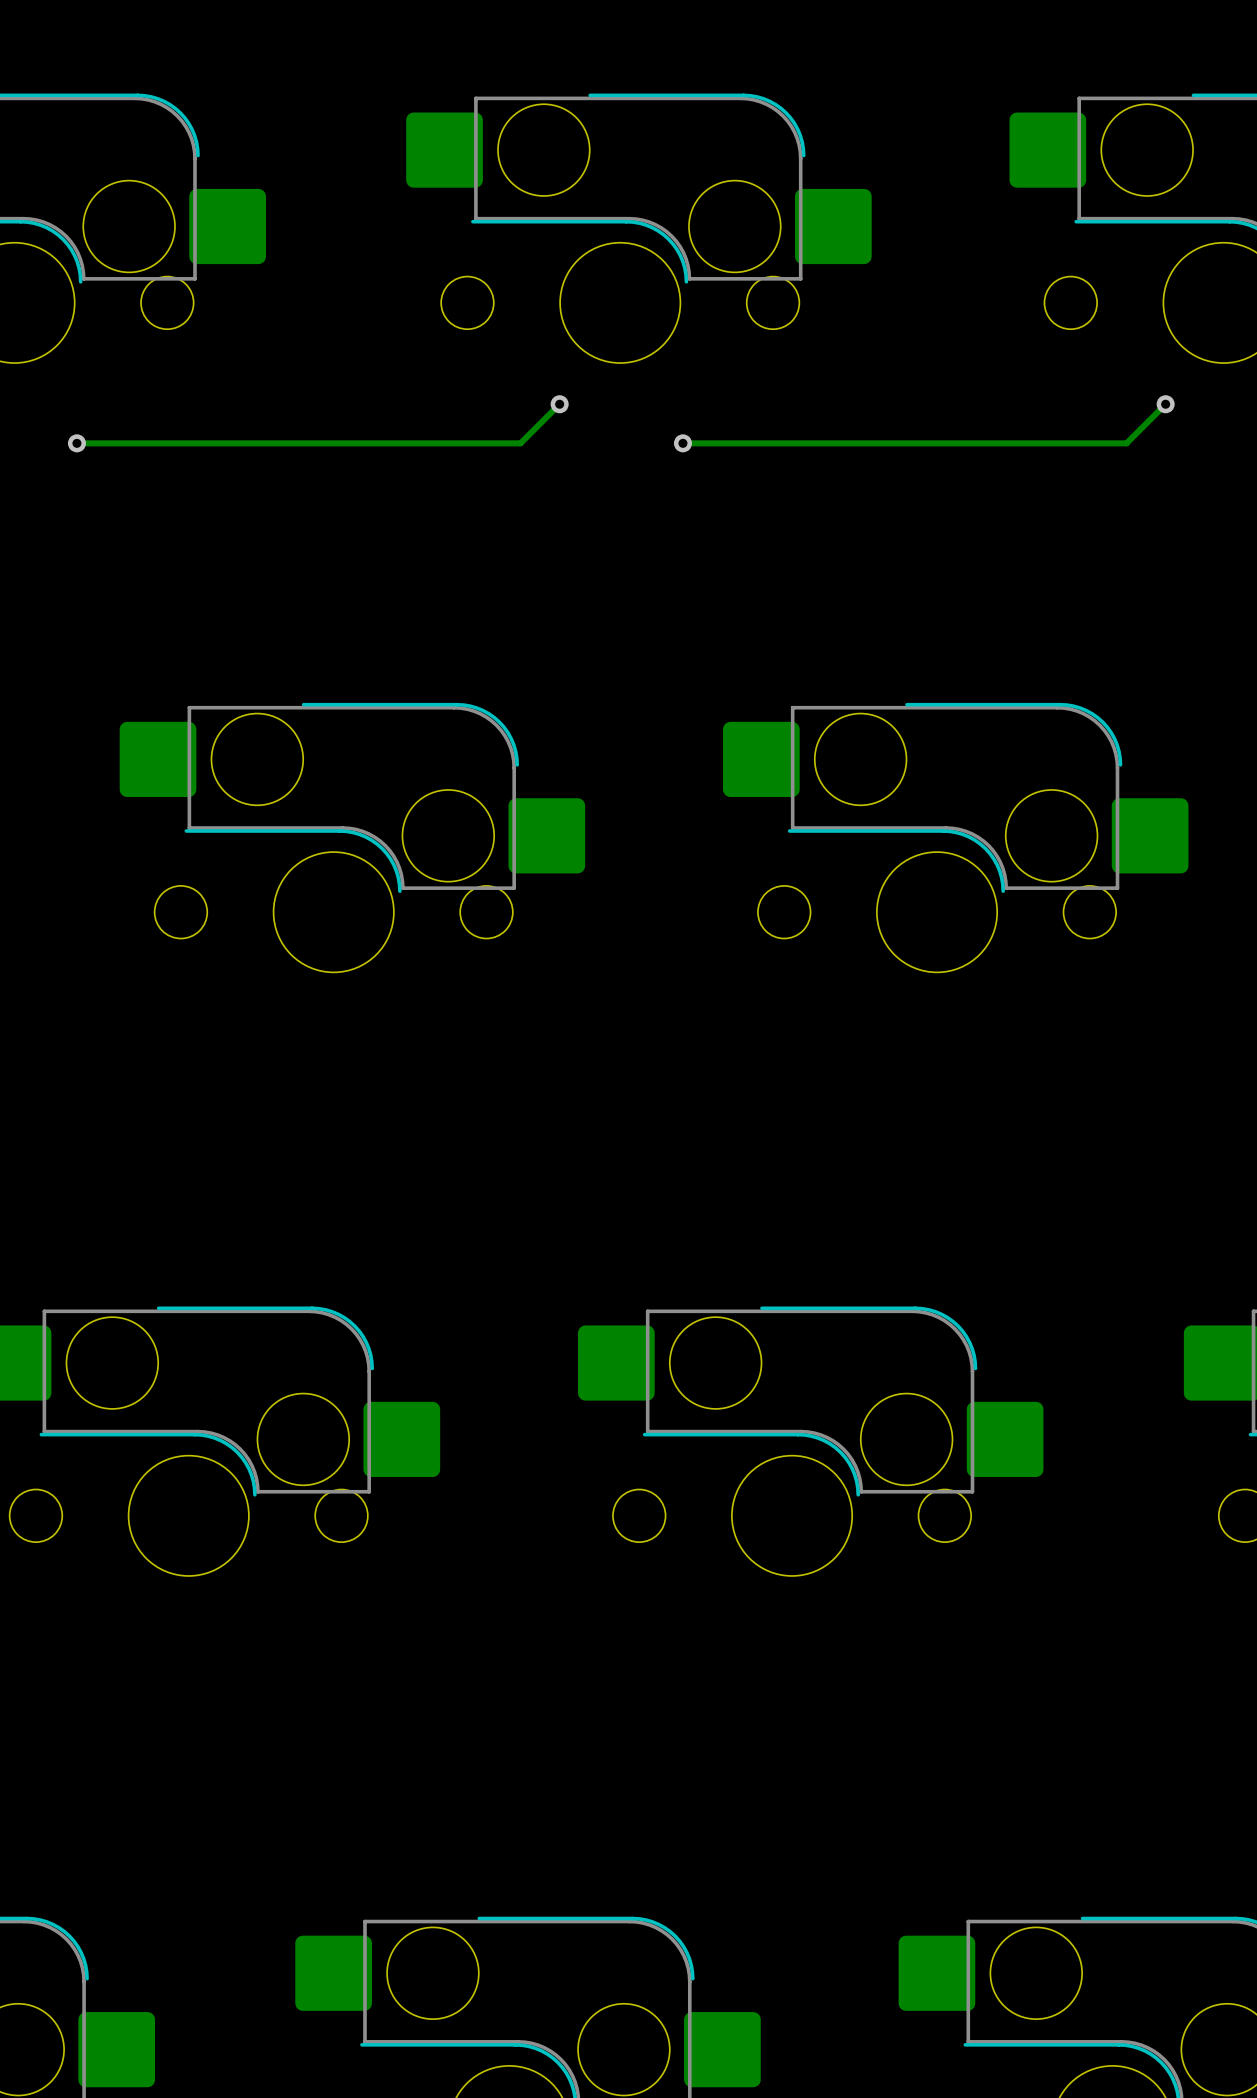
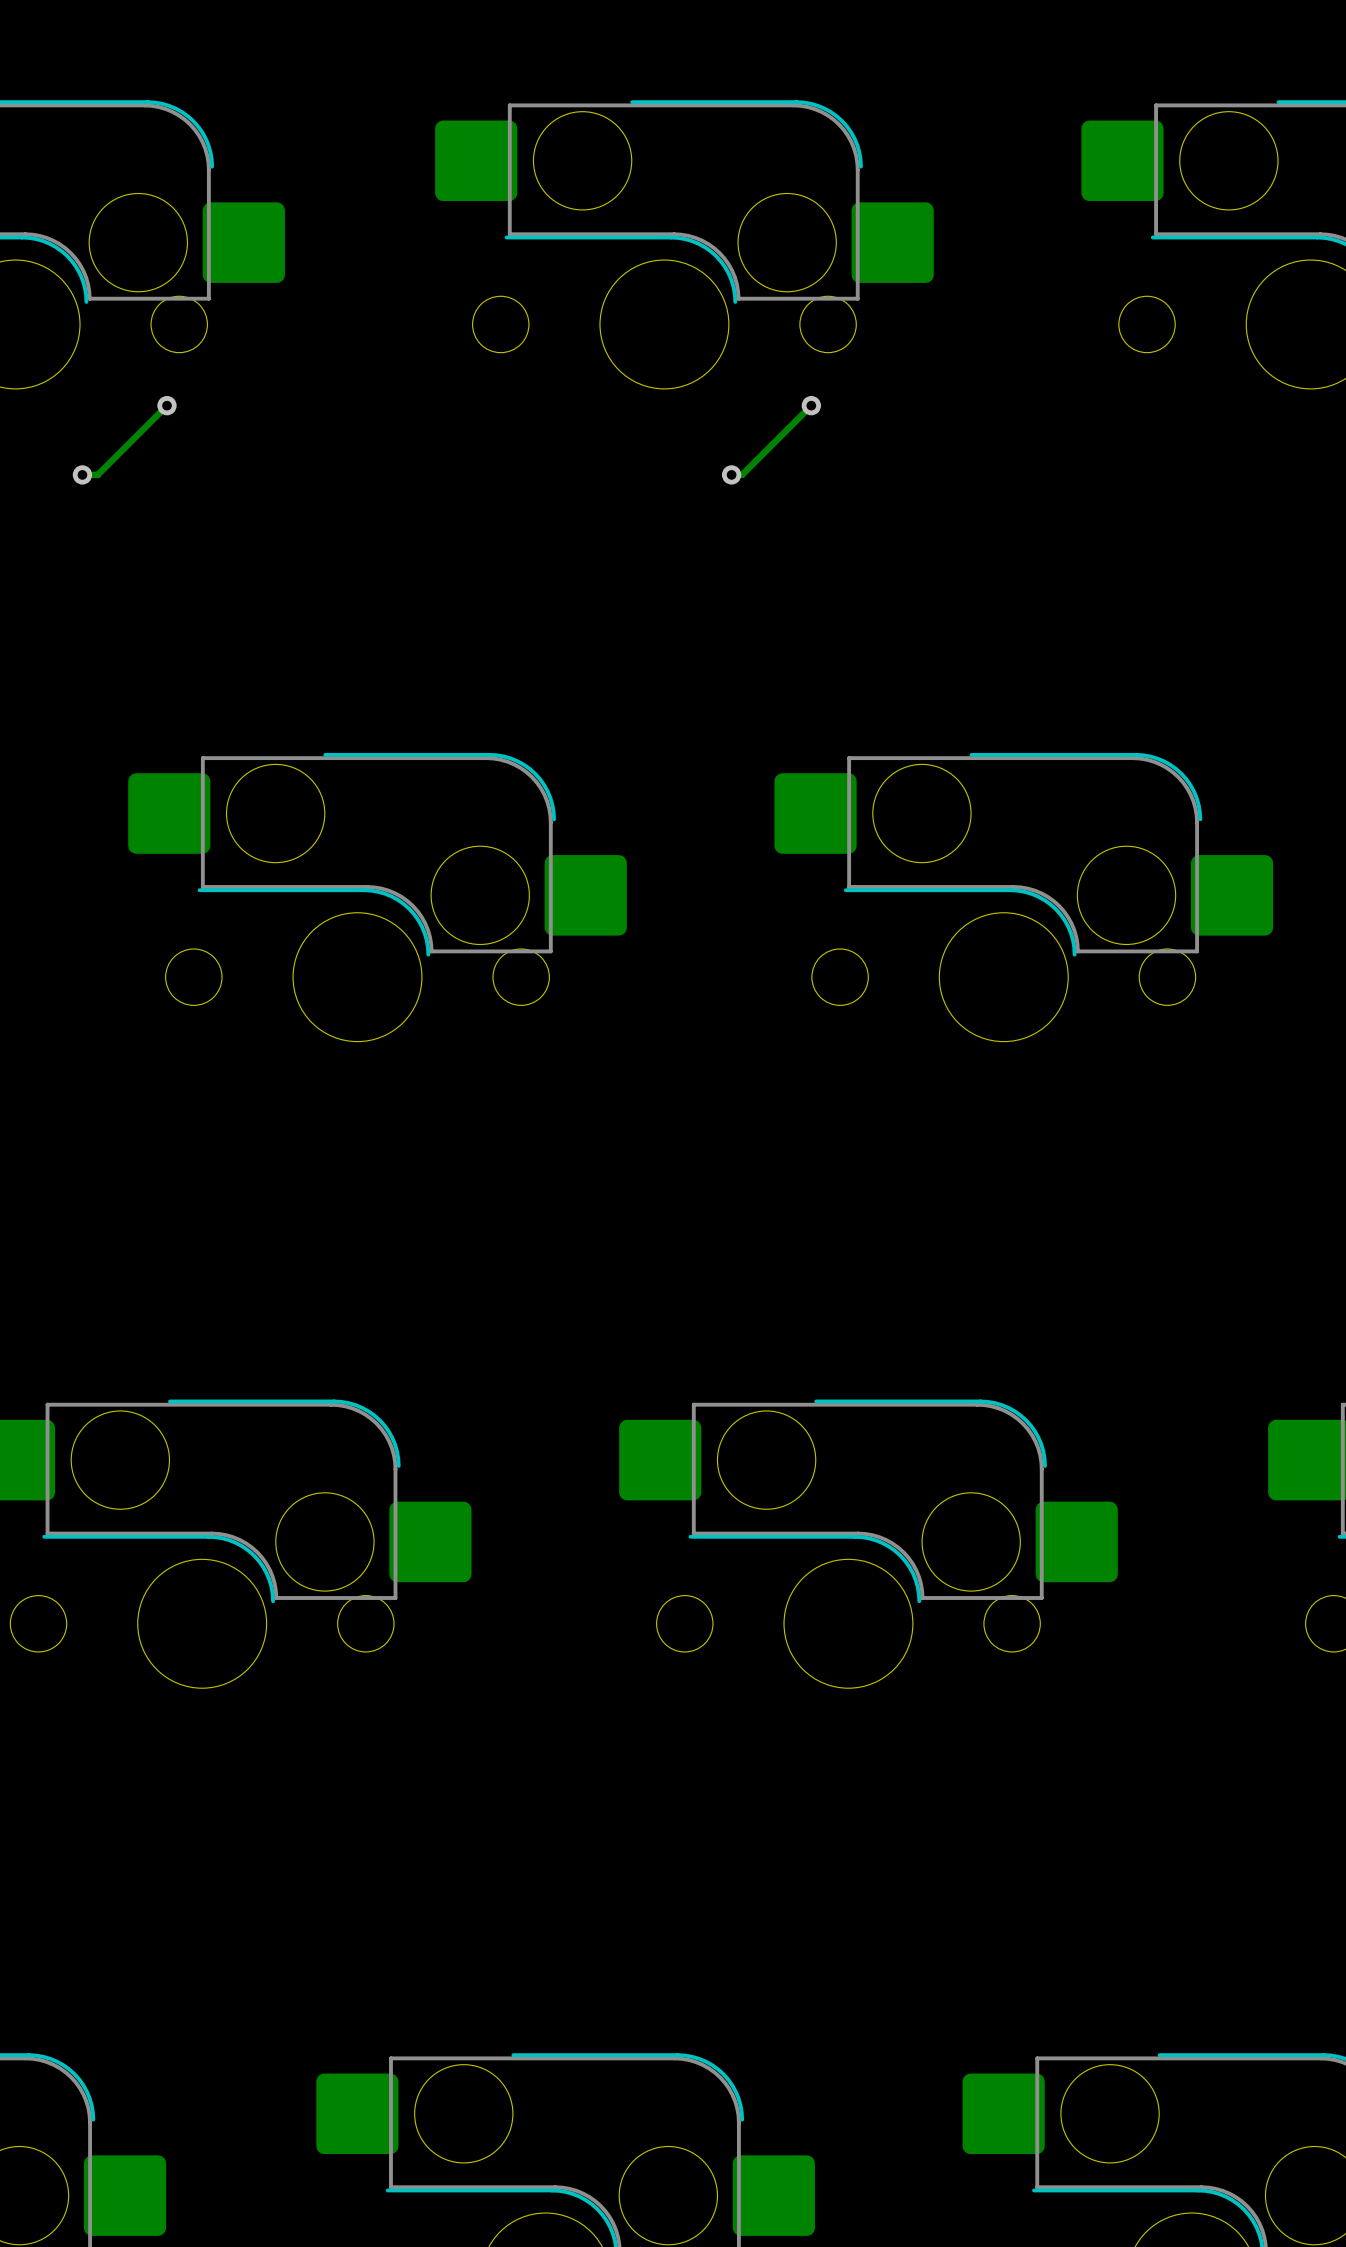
via: none -> (167, 405)
via: none -> (811, 405)
track: (559, 404) (520, 443) (91, 443) -> (167, 405) (97, 474)
via: (559, 404) -> none
track: (1165, 404) (1126, 443) (692, 443) -> (811, 405) (742, 474)
via: (1165, 404) -> none

